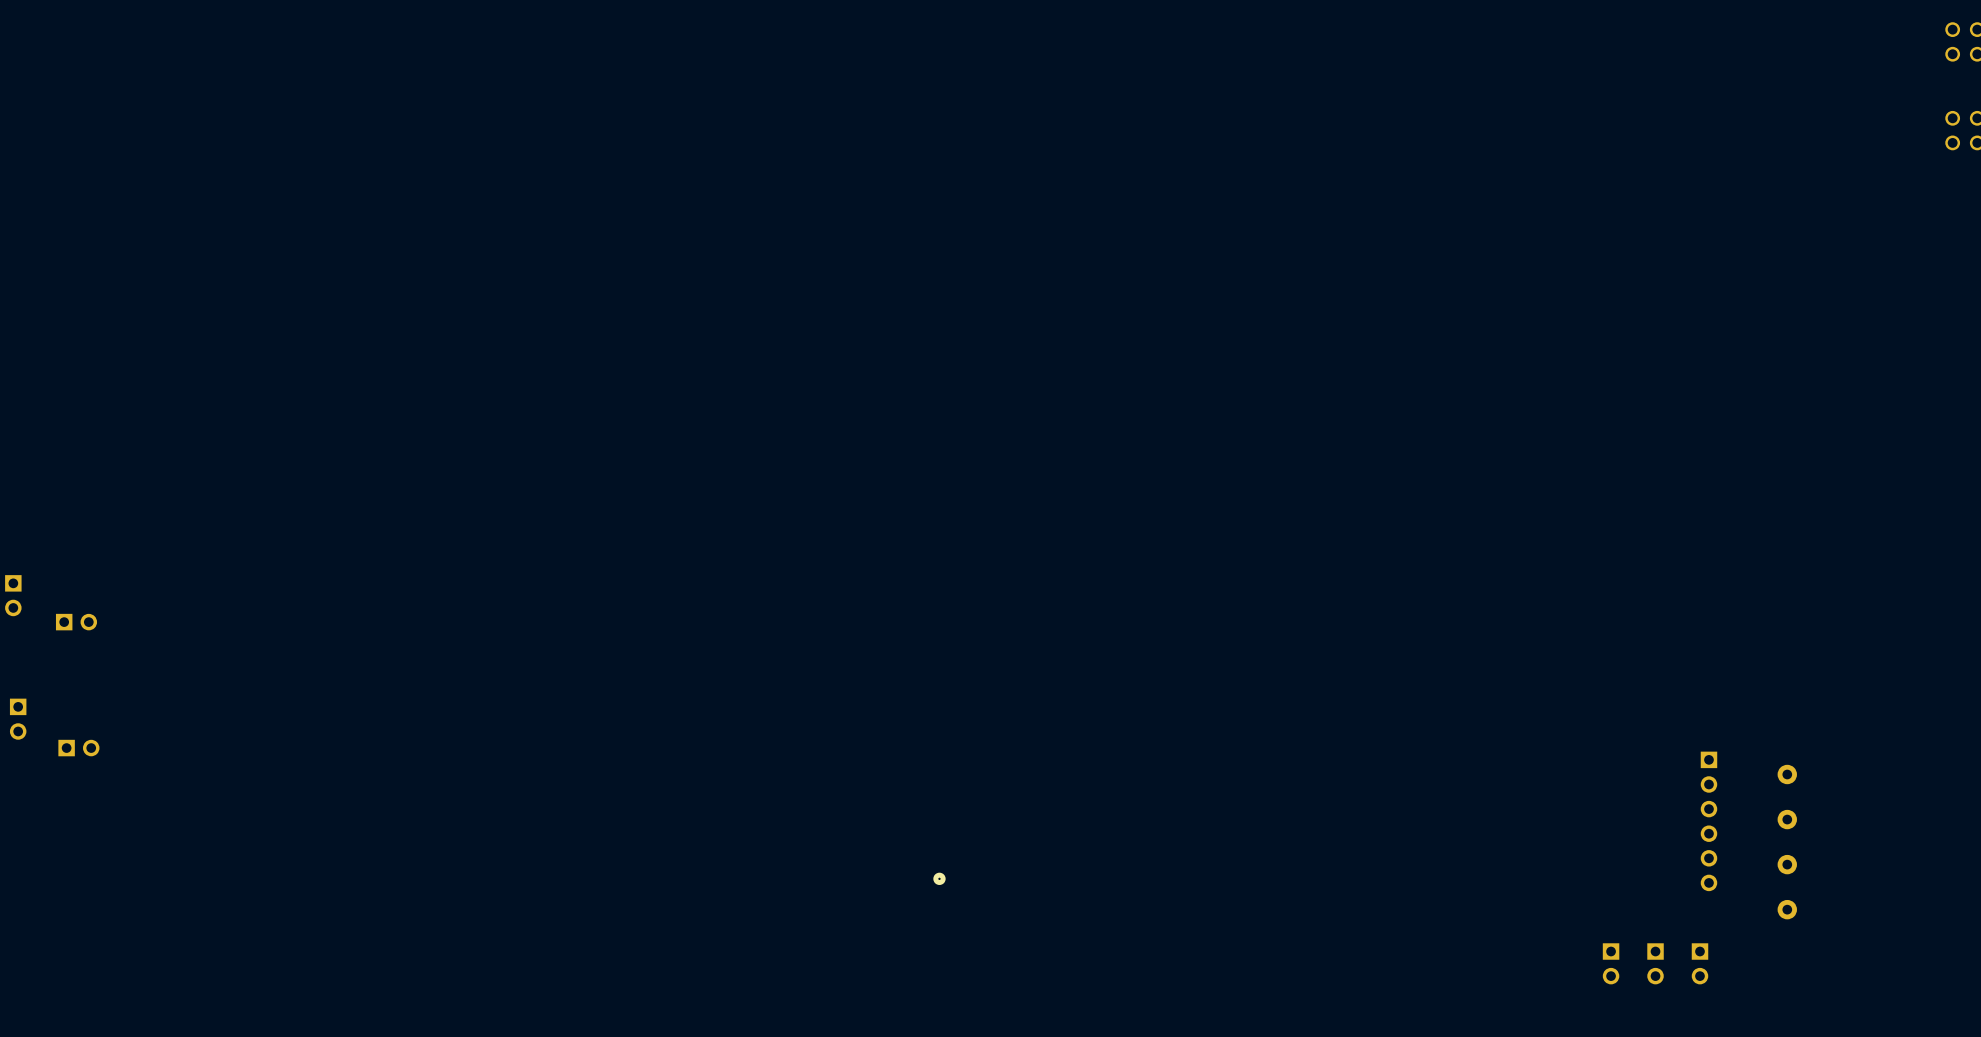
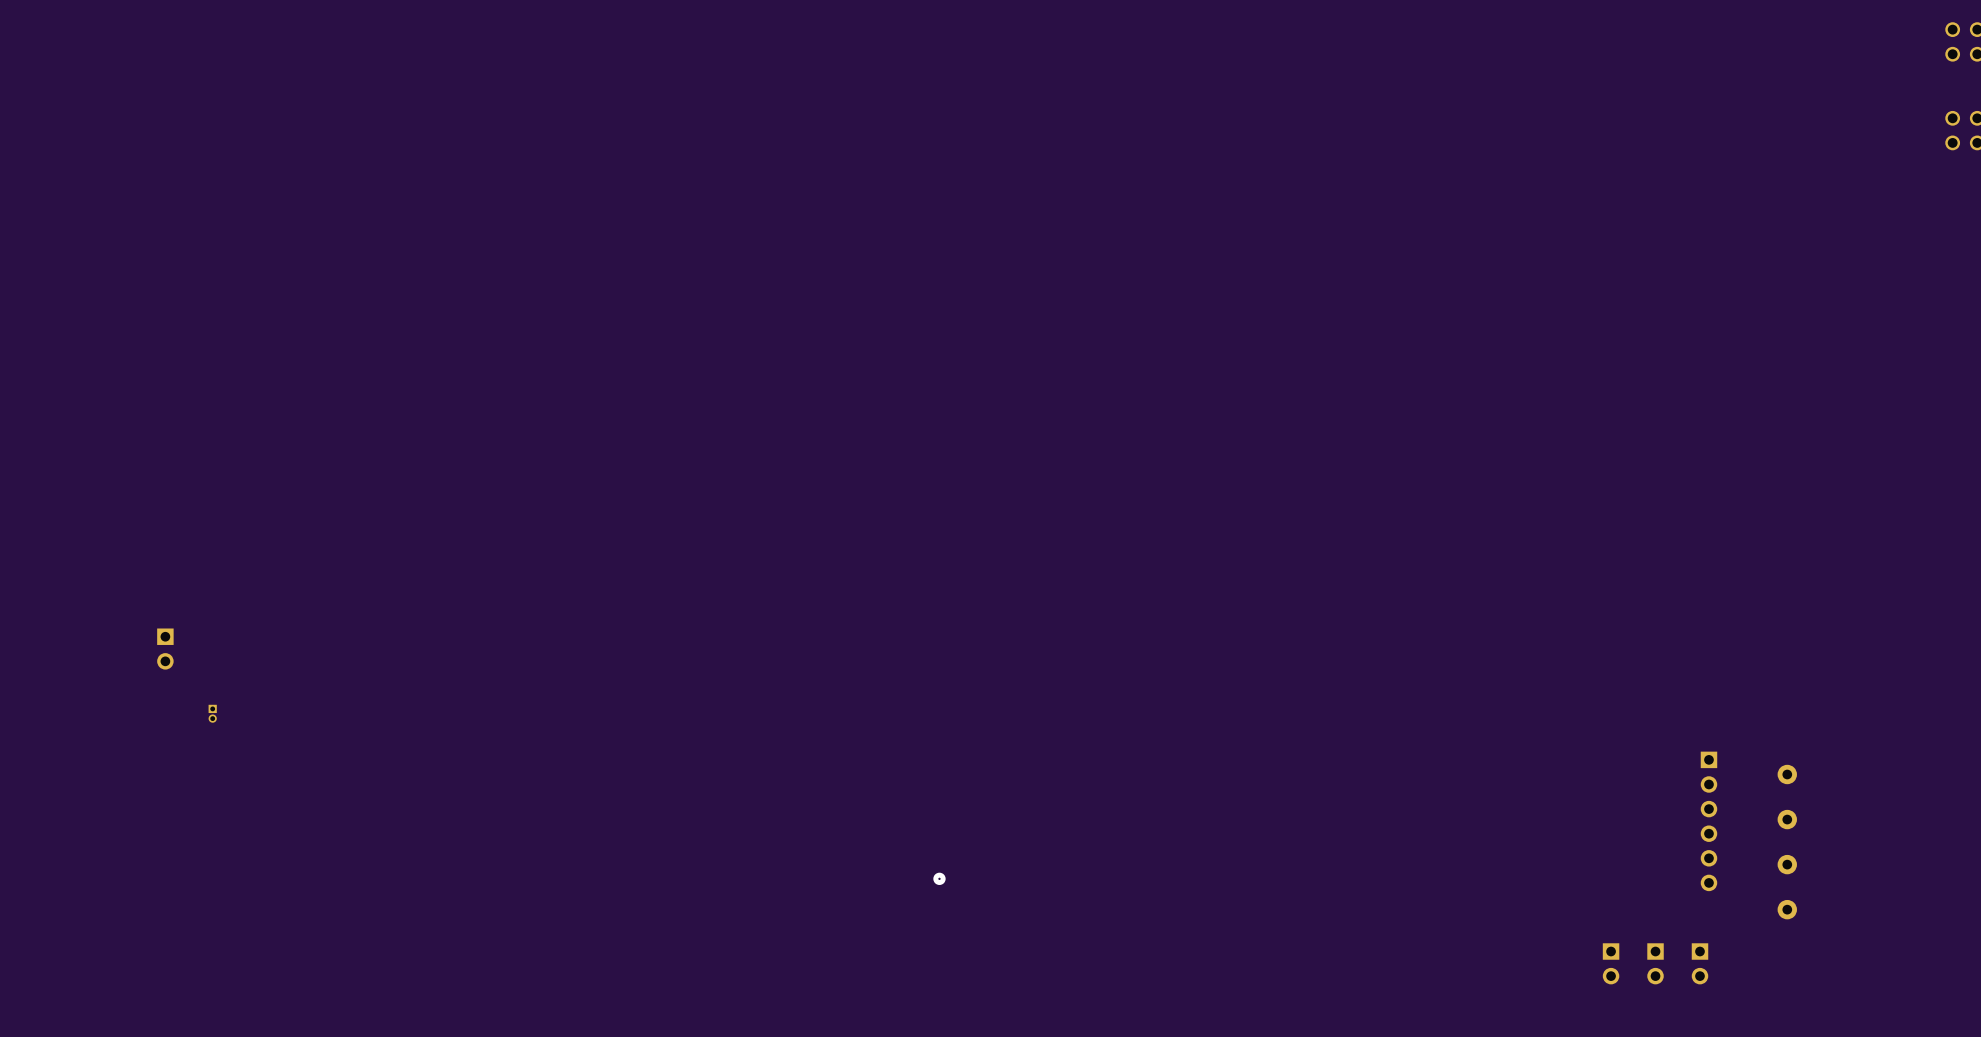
part: (13, 595) -> none
part: (76, 622) -> none
part: none -> (165, 649)
part: none -> (212, 713)
part: (18, 719) -> none
part: (78, 748) -> none

